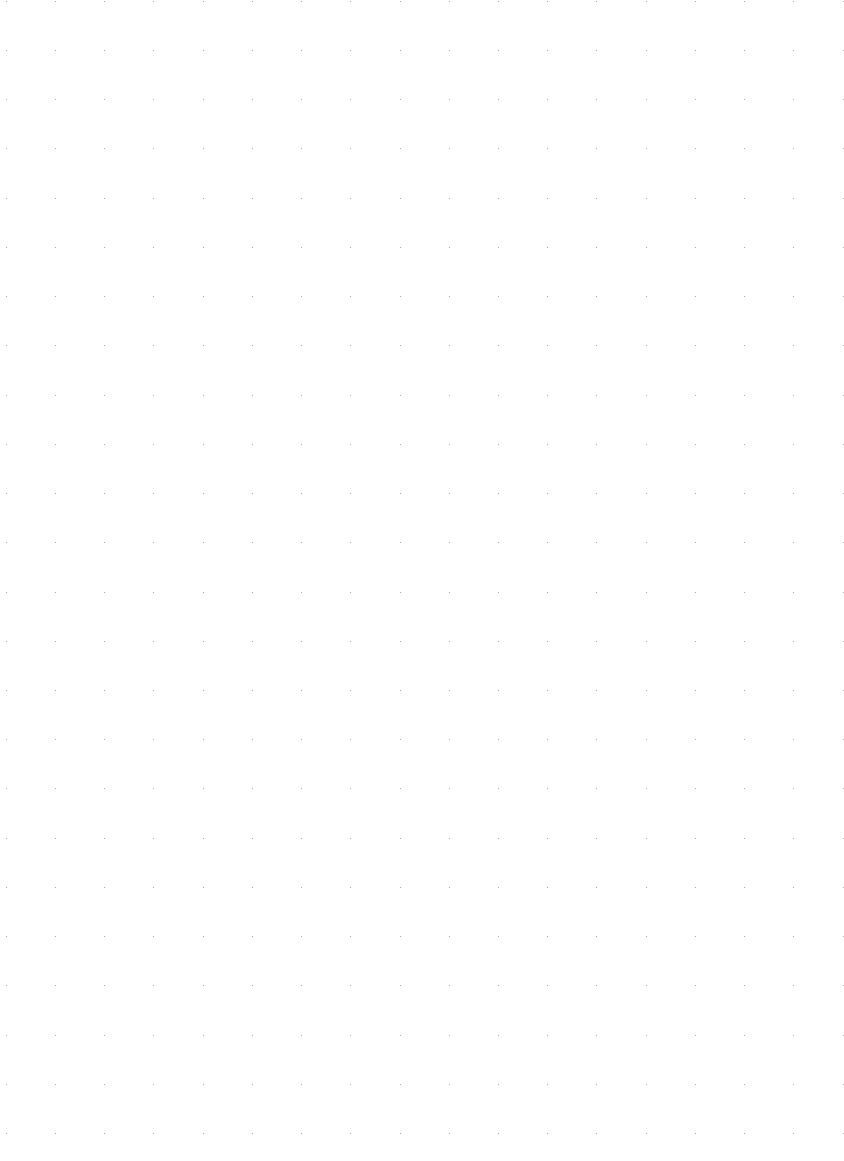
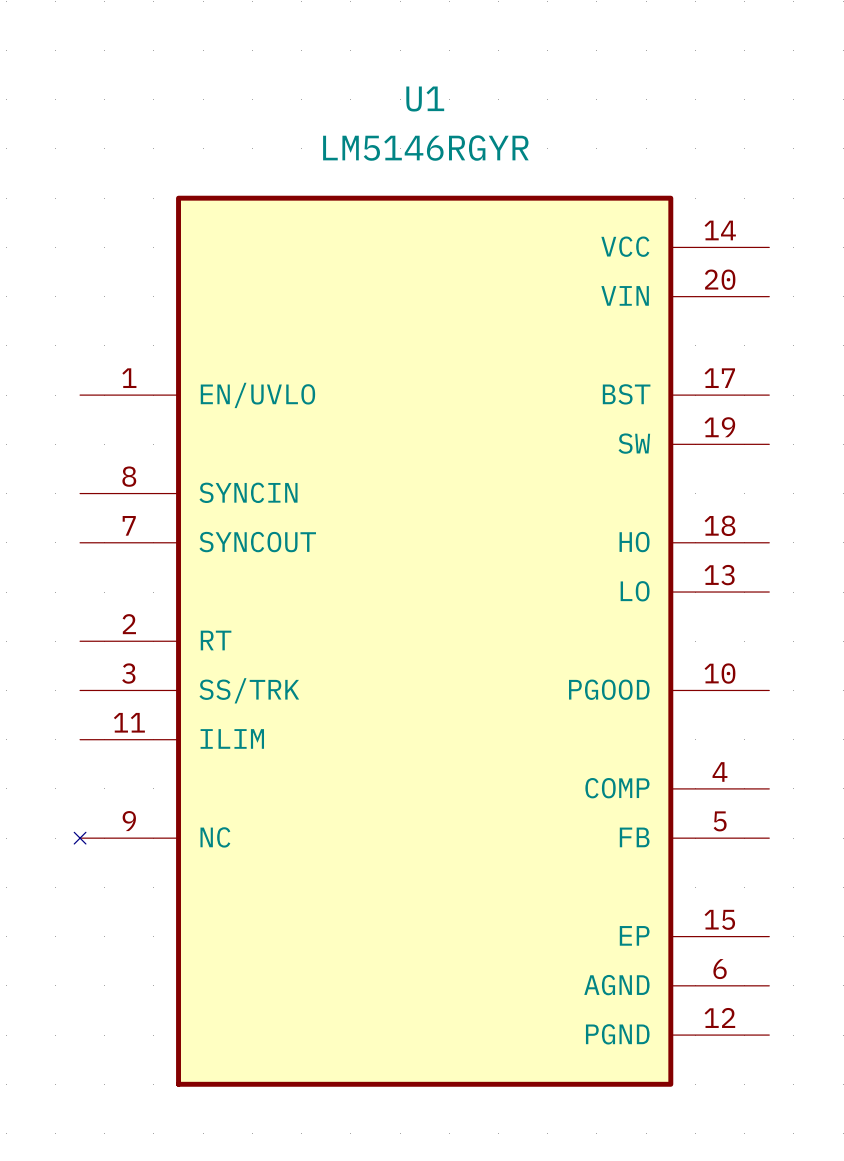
U1: none -> LM5146RGYR (421, 641)

